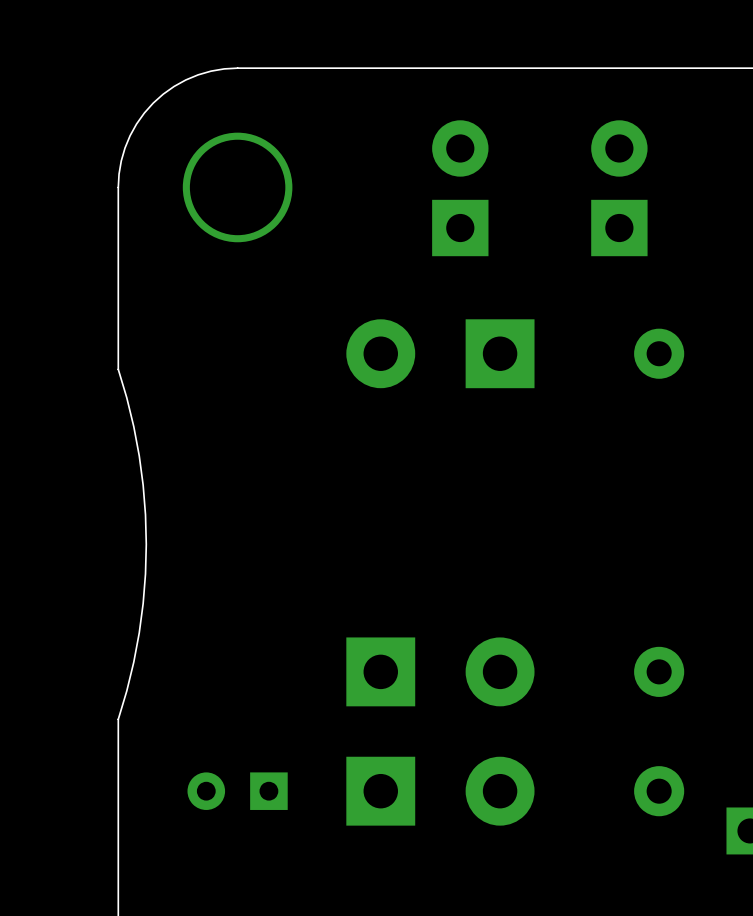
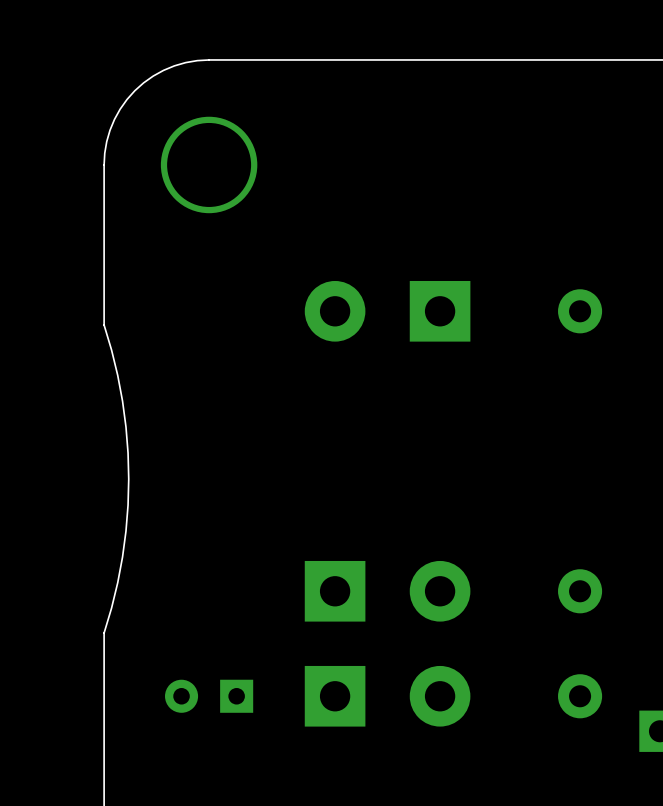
part: (460, 188) -> none
part: (619, 188) -> none

